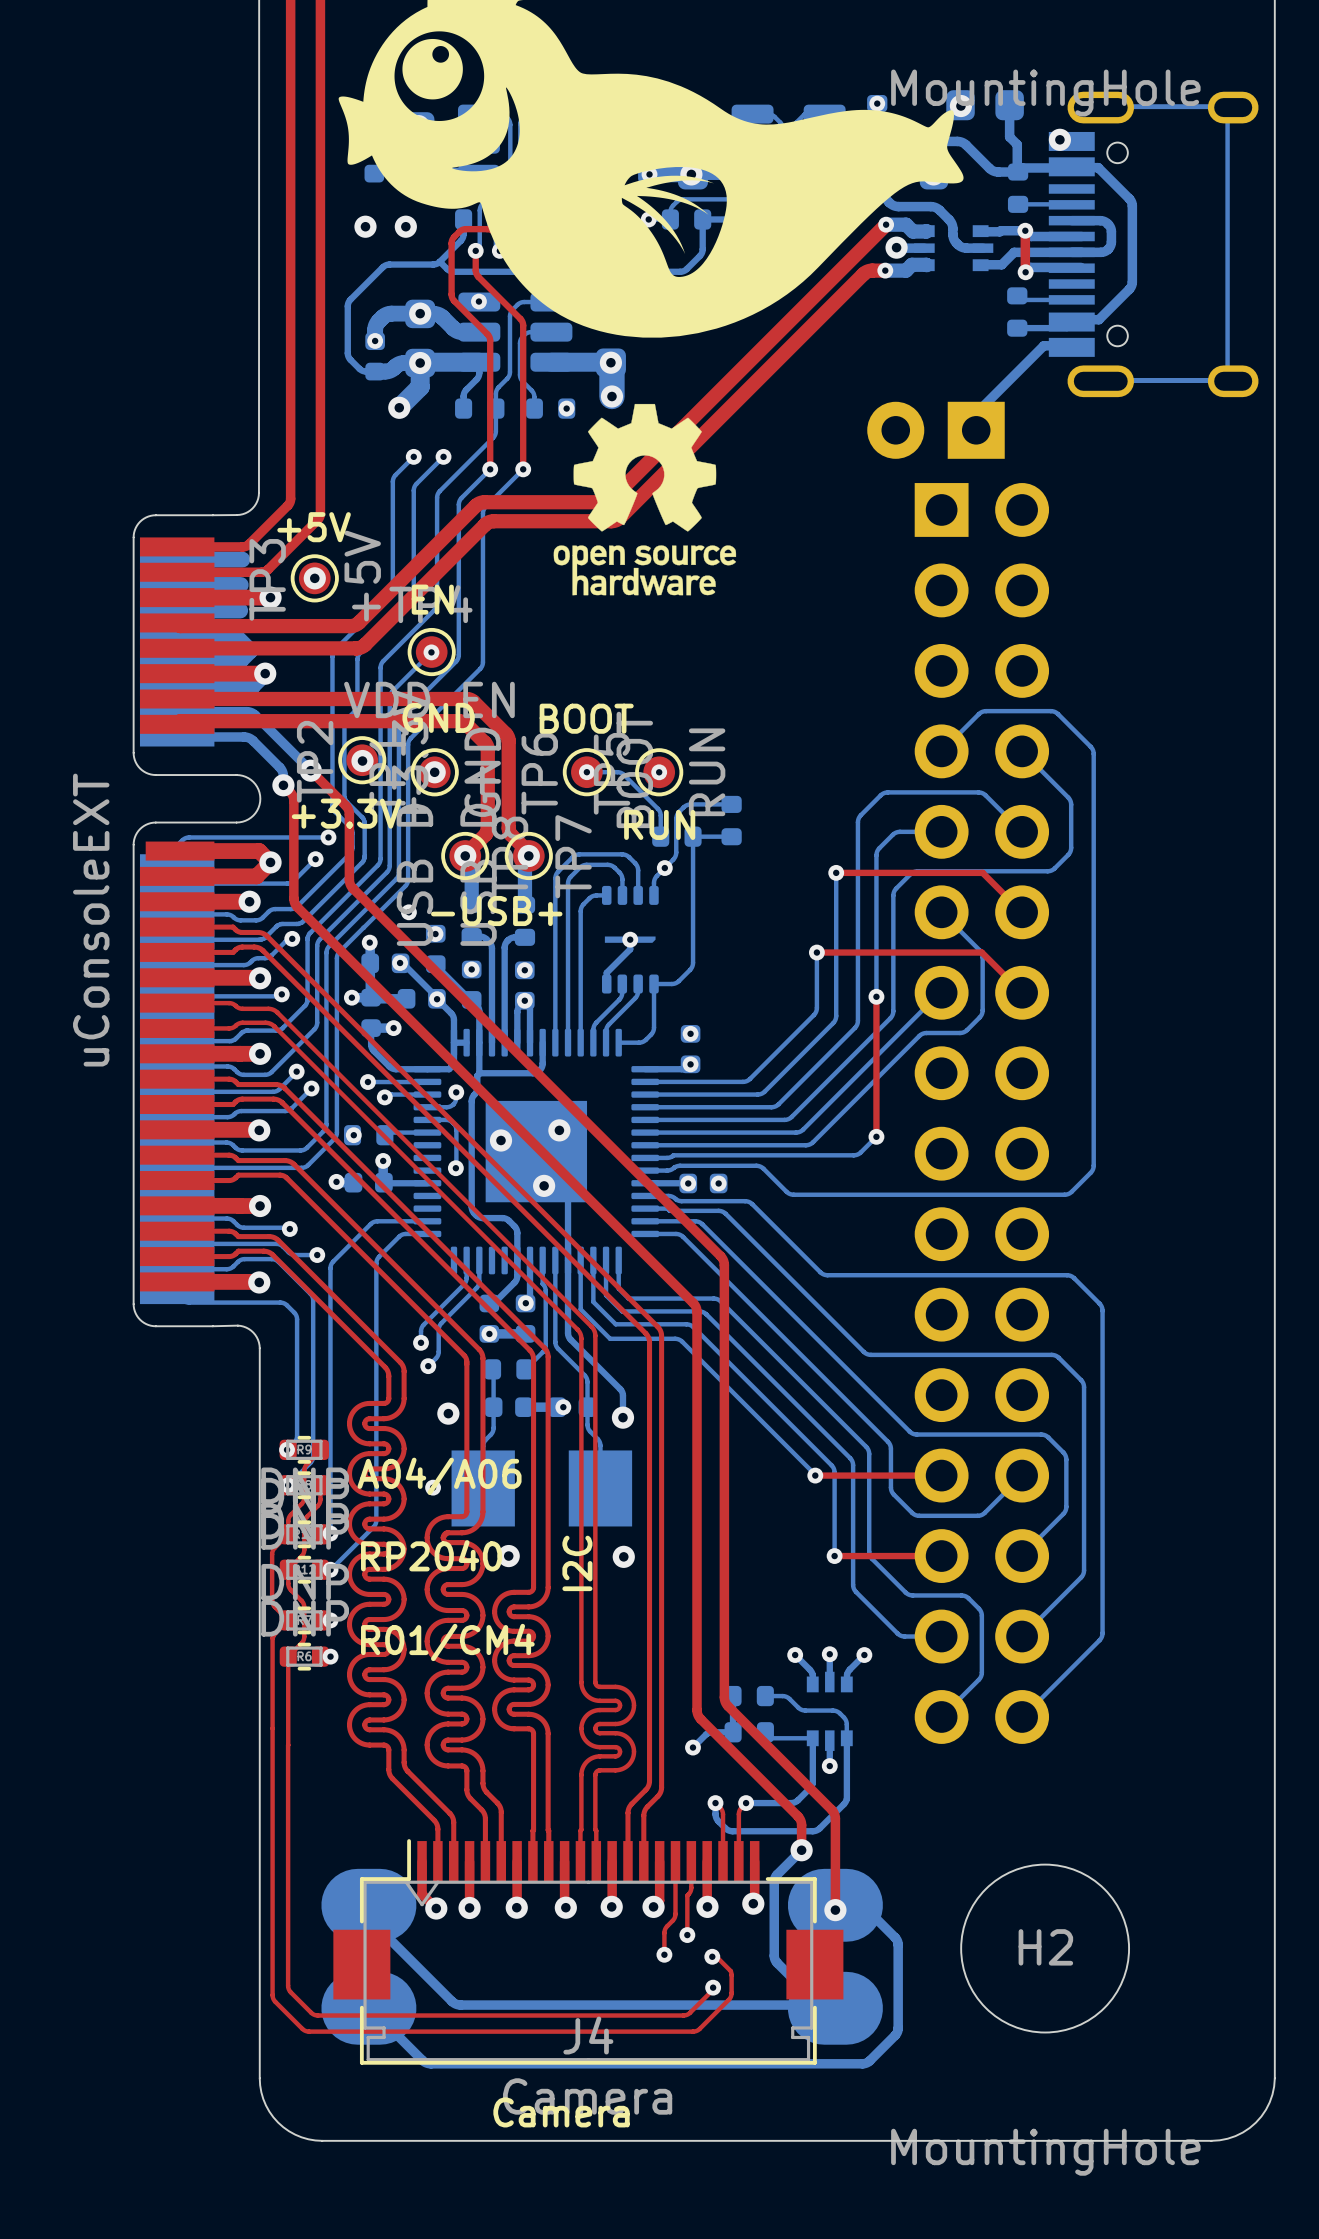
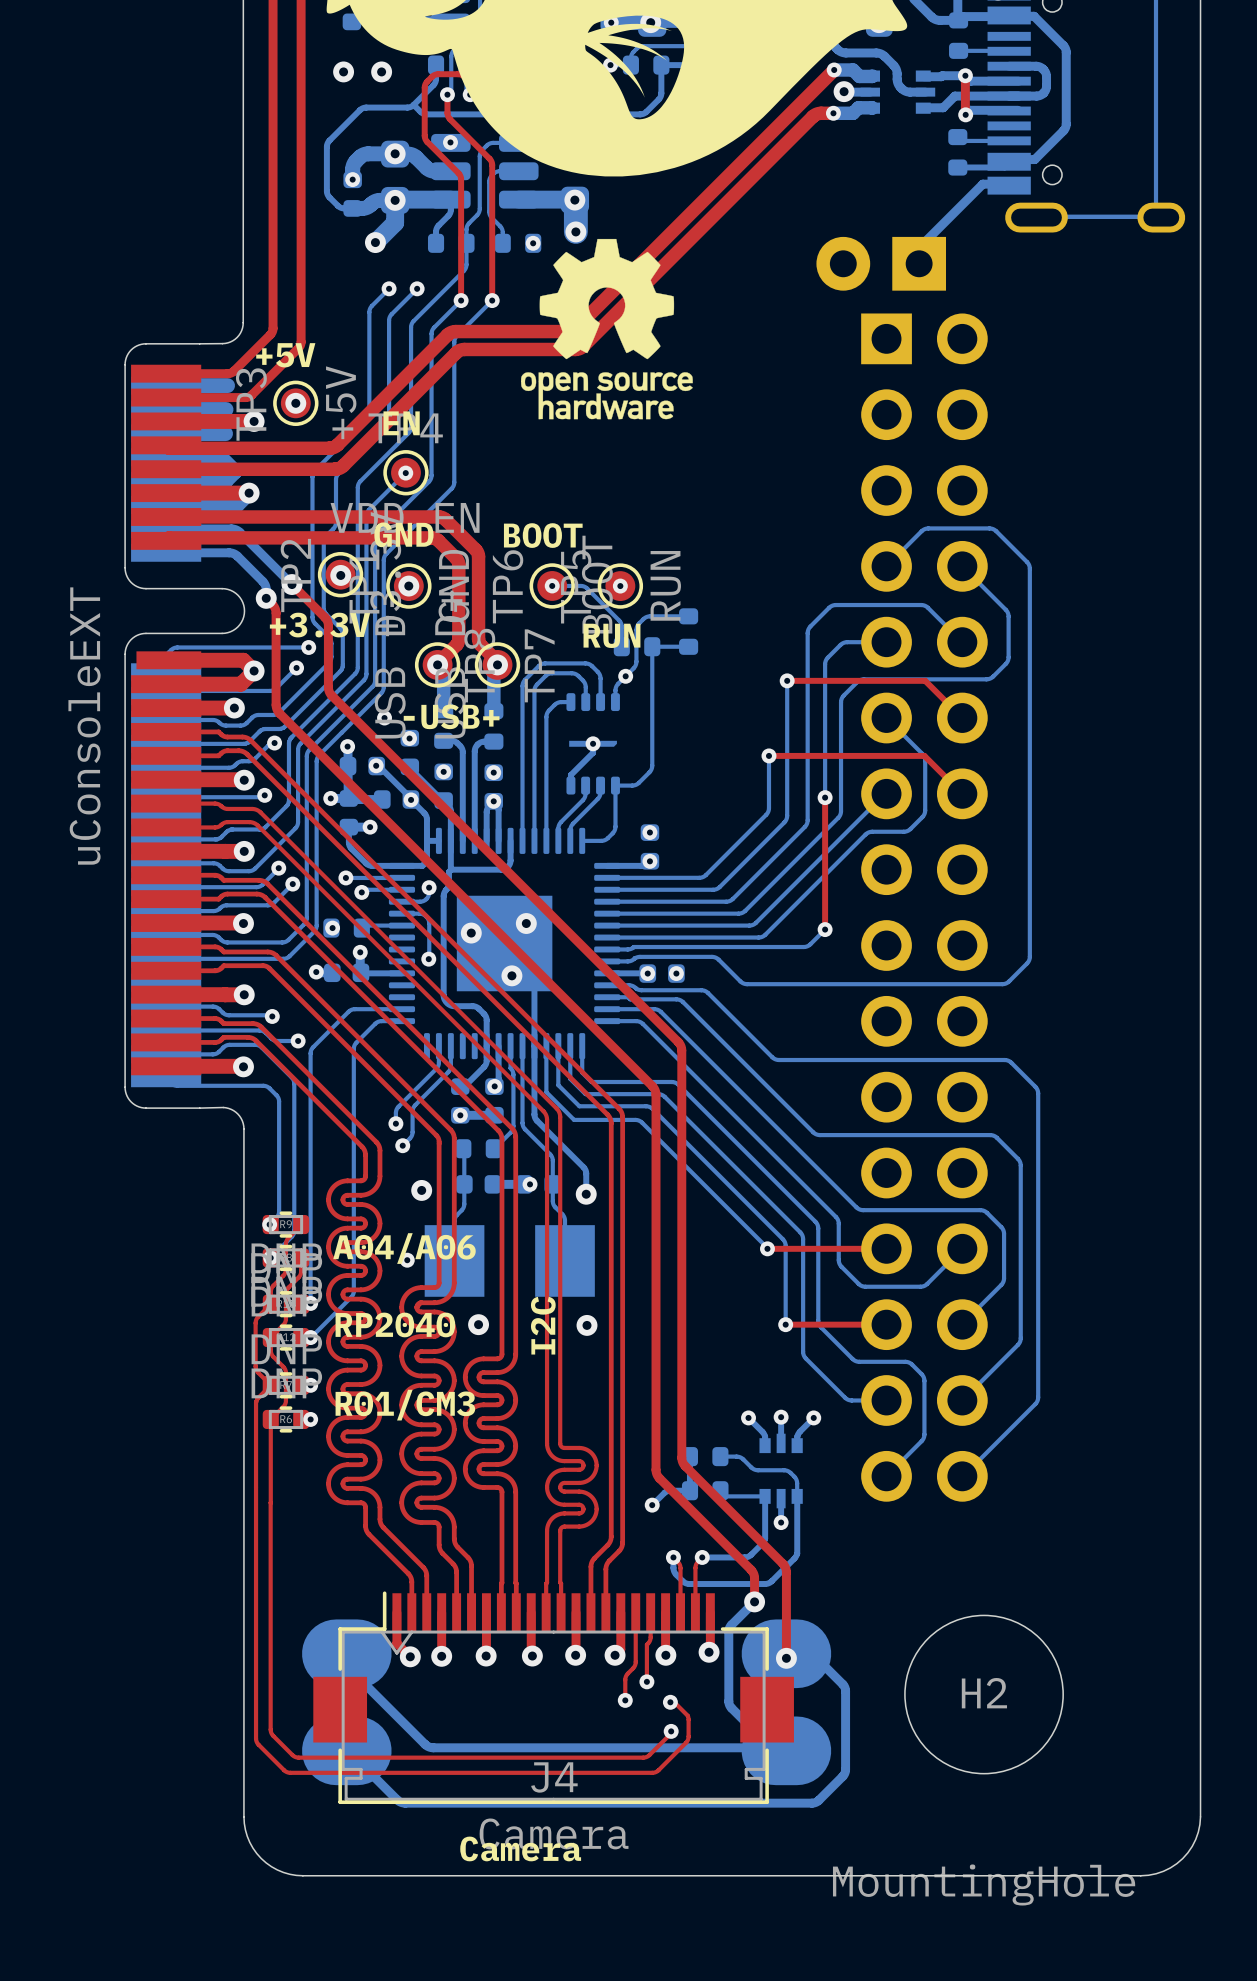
text: R01/CM4 (447, 1642) -> R01/CM3 (405, 1405)

